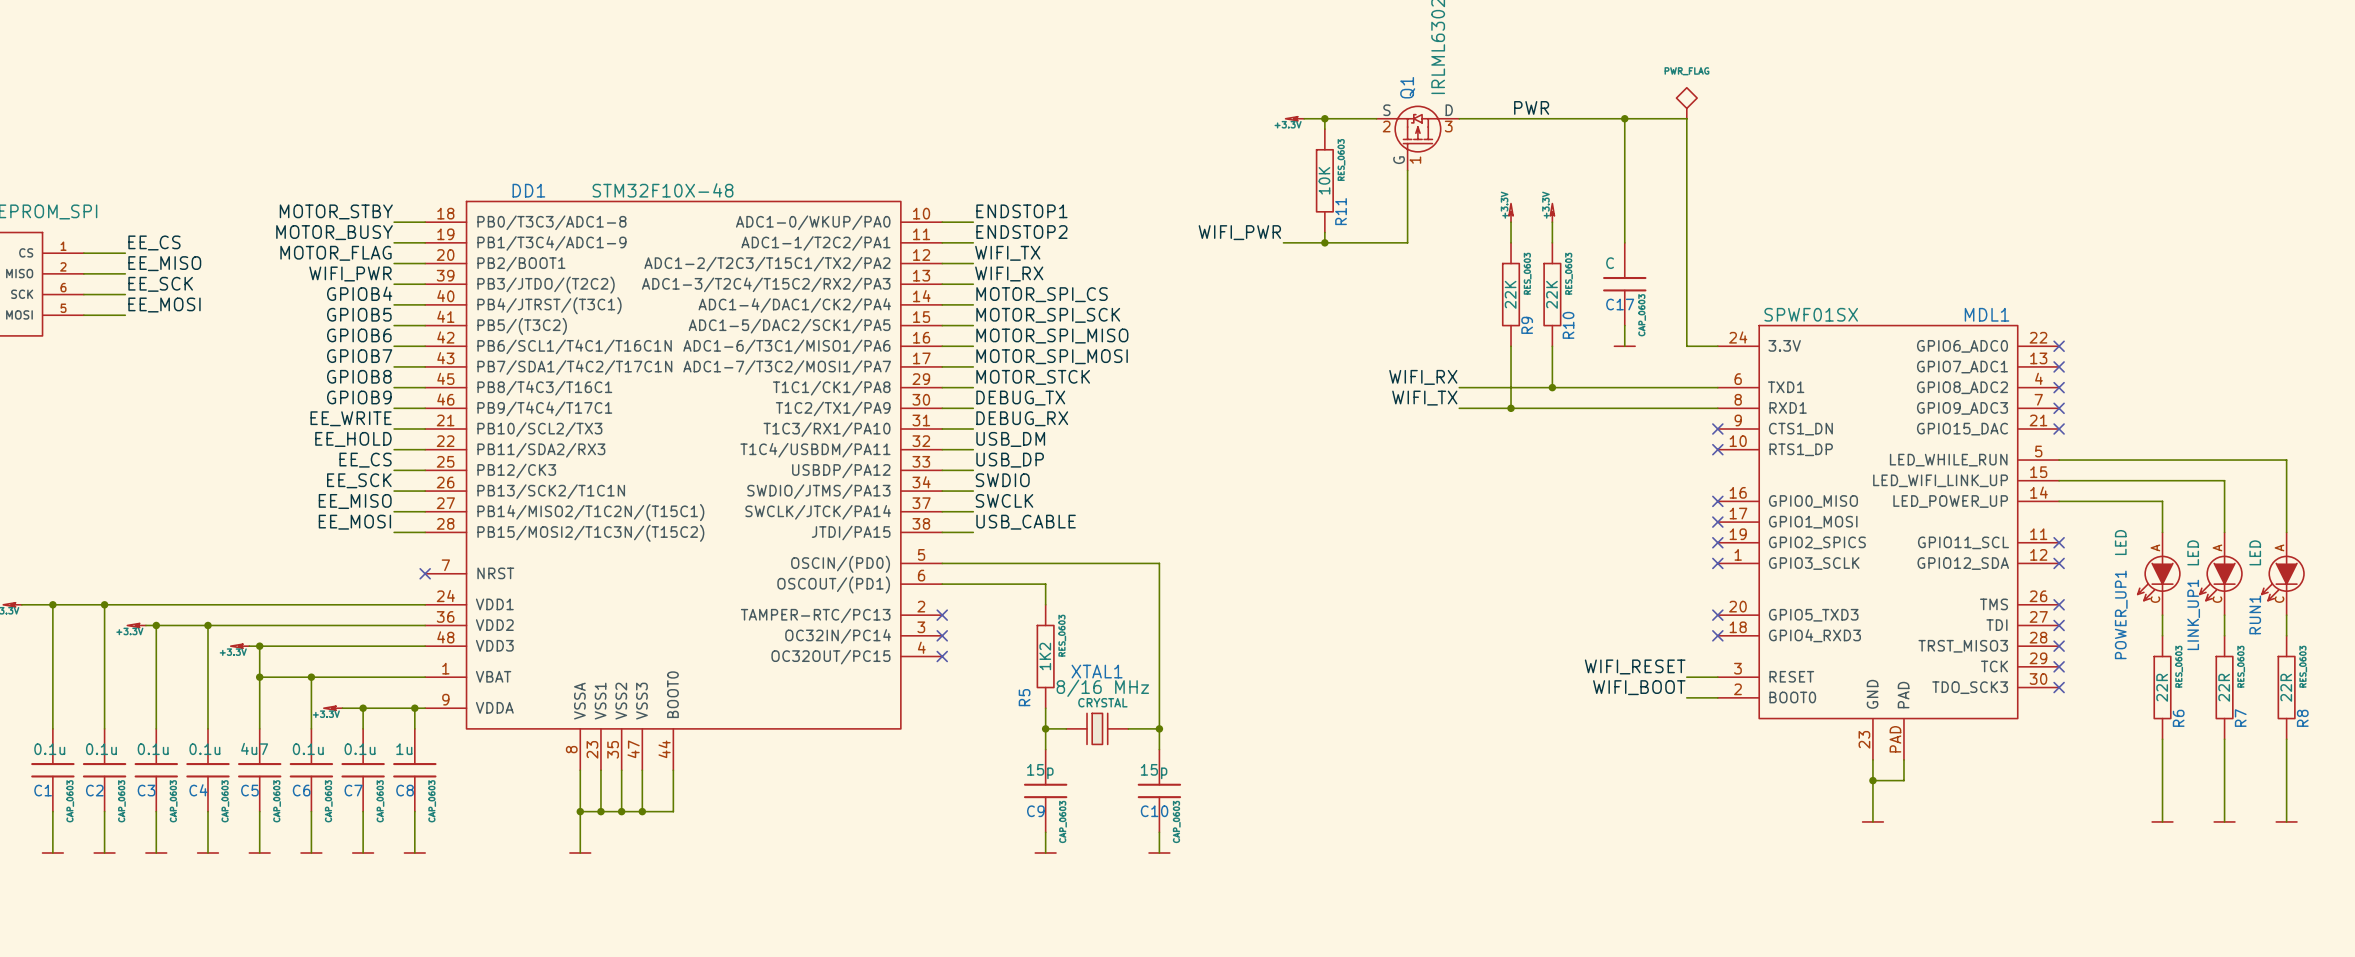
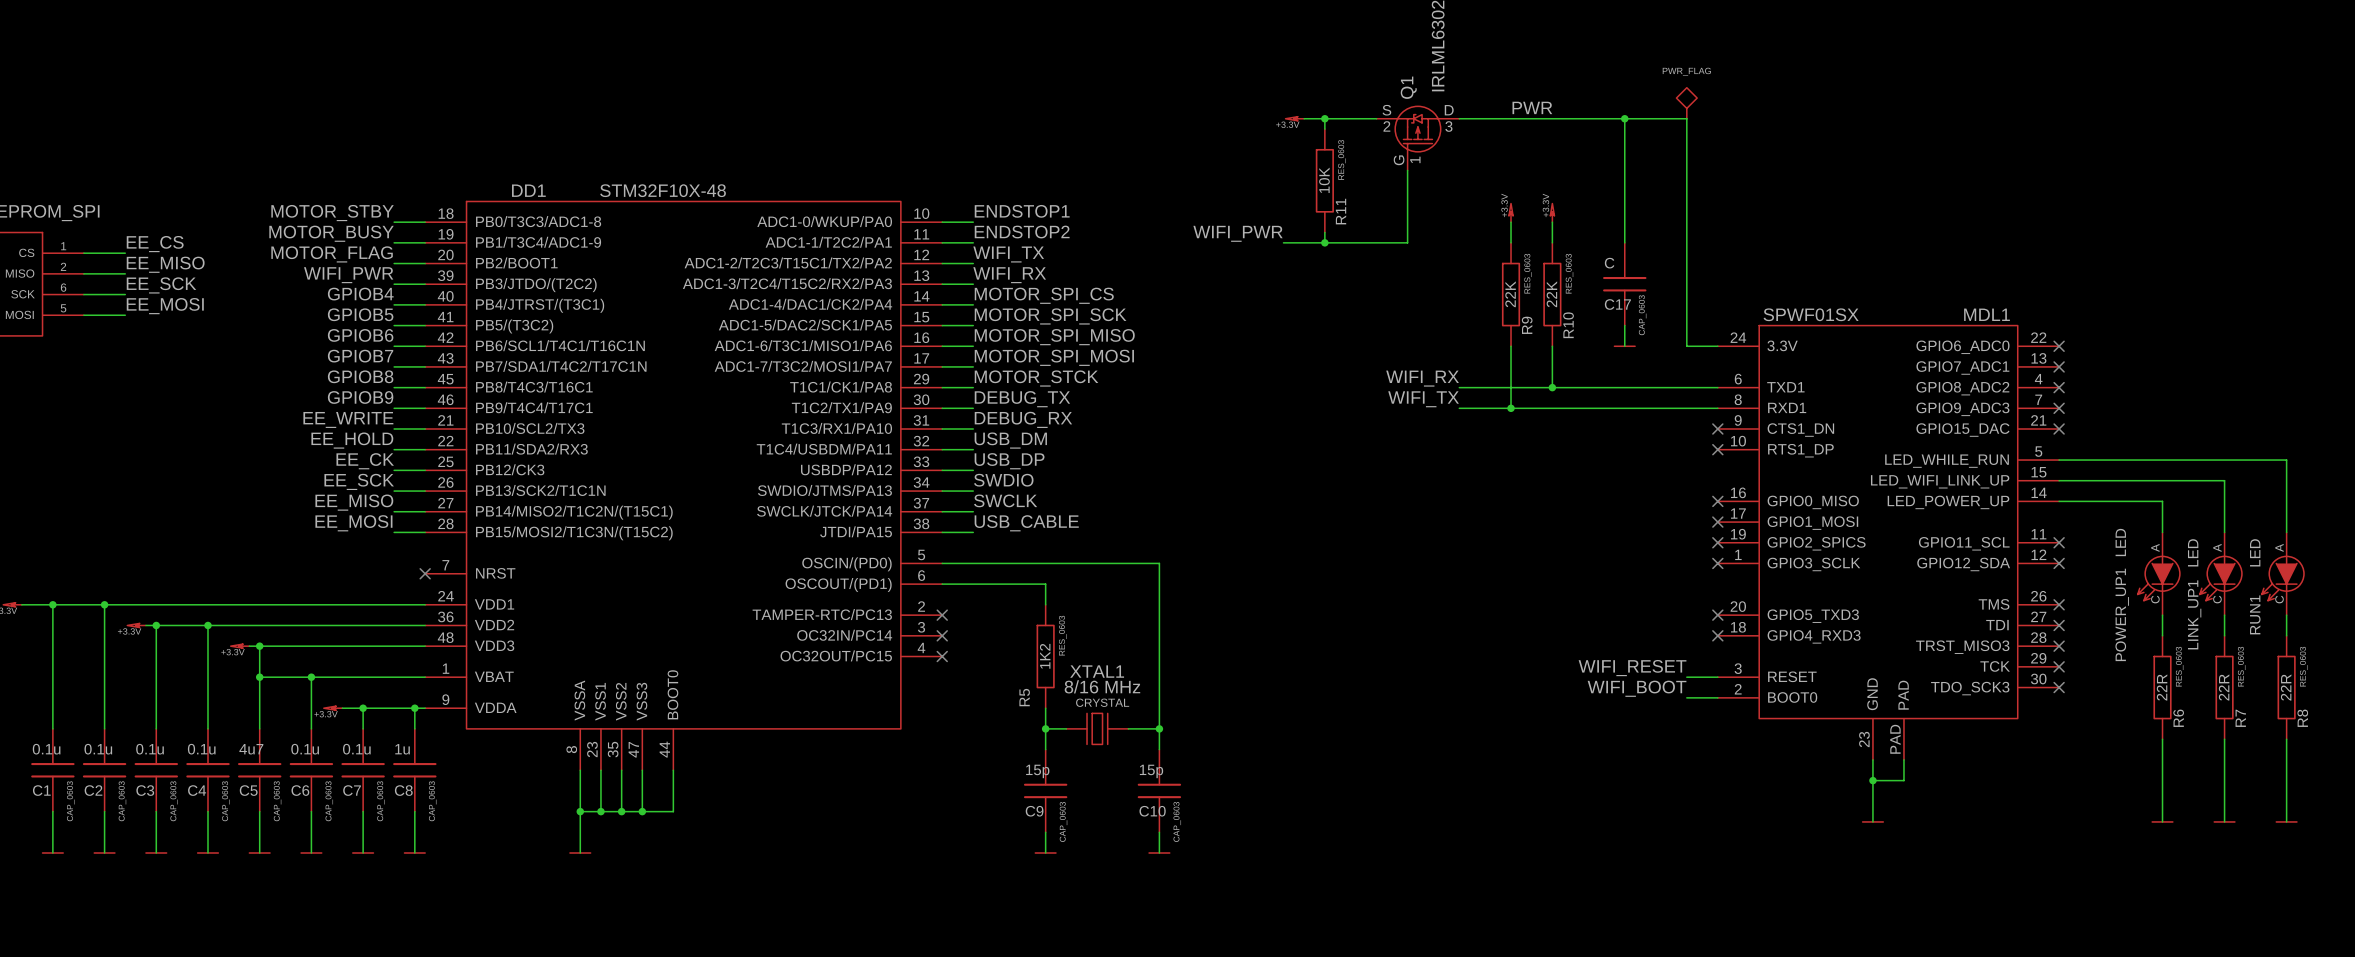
label: EE_CS (365, 460) -> EE_CK (365, 461)

